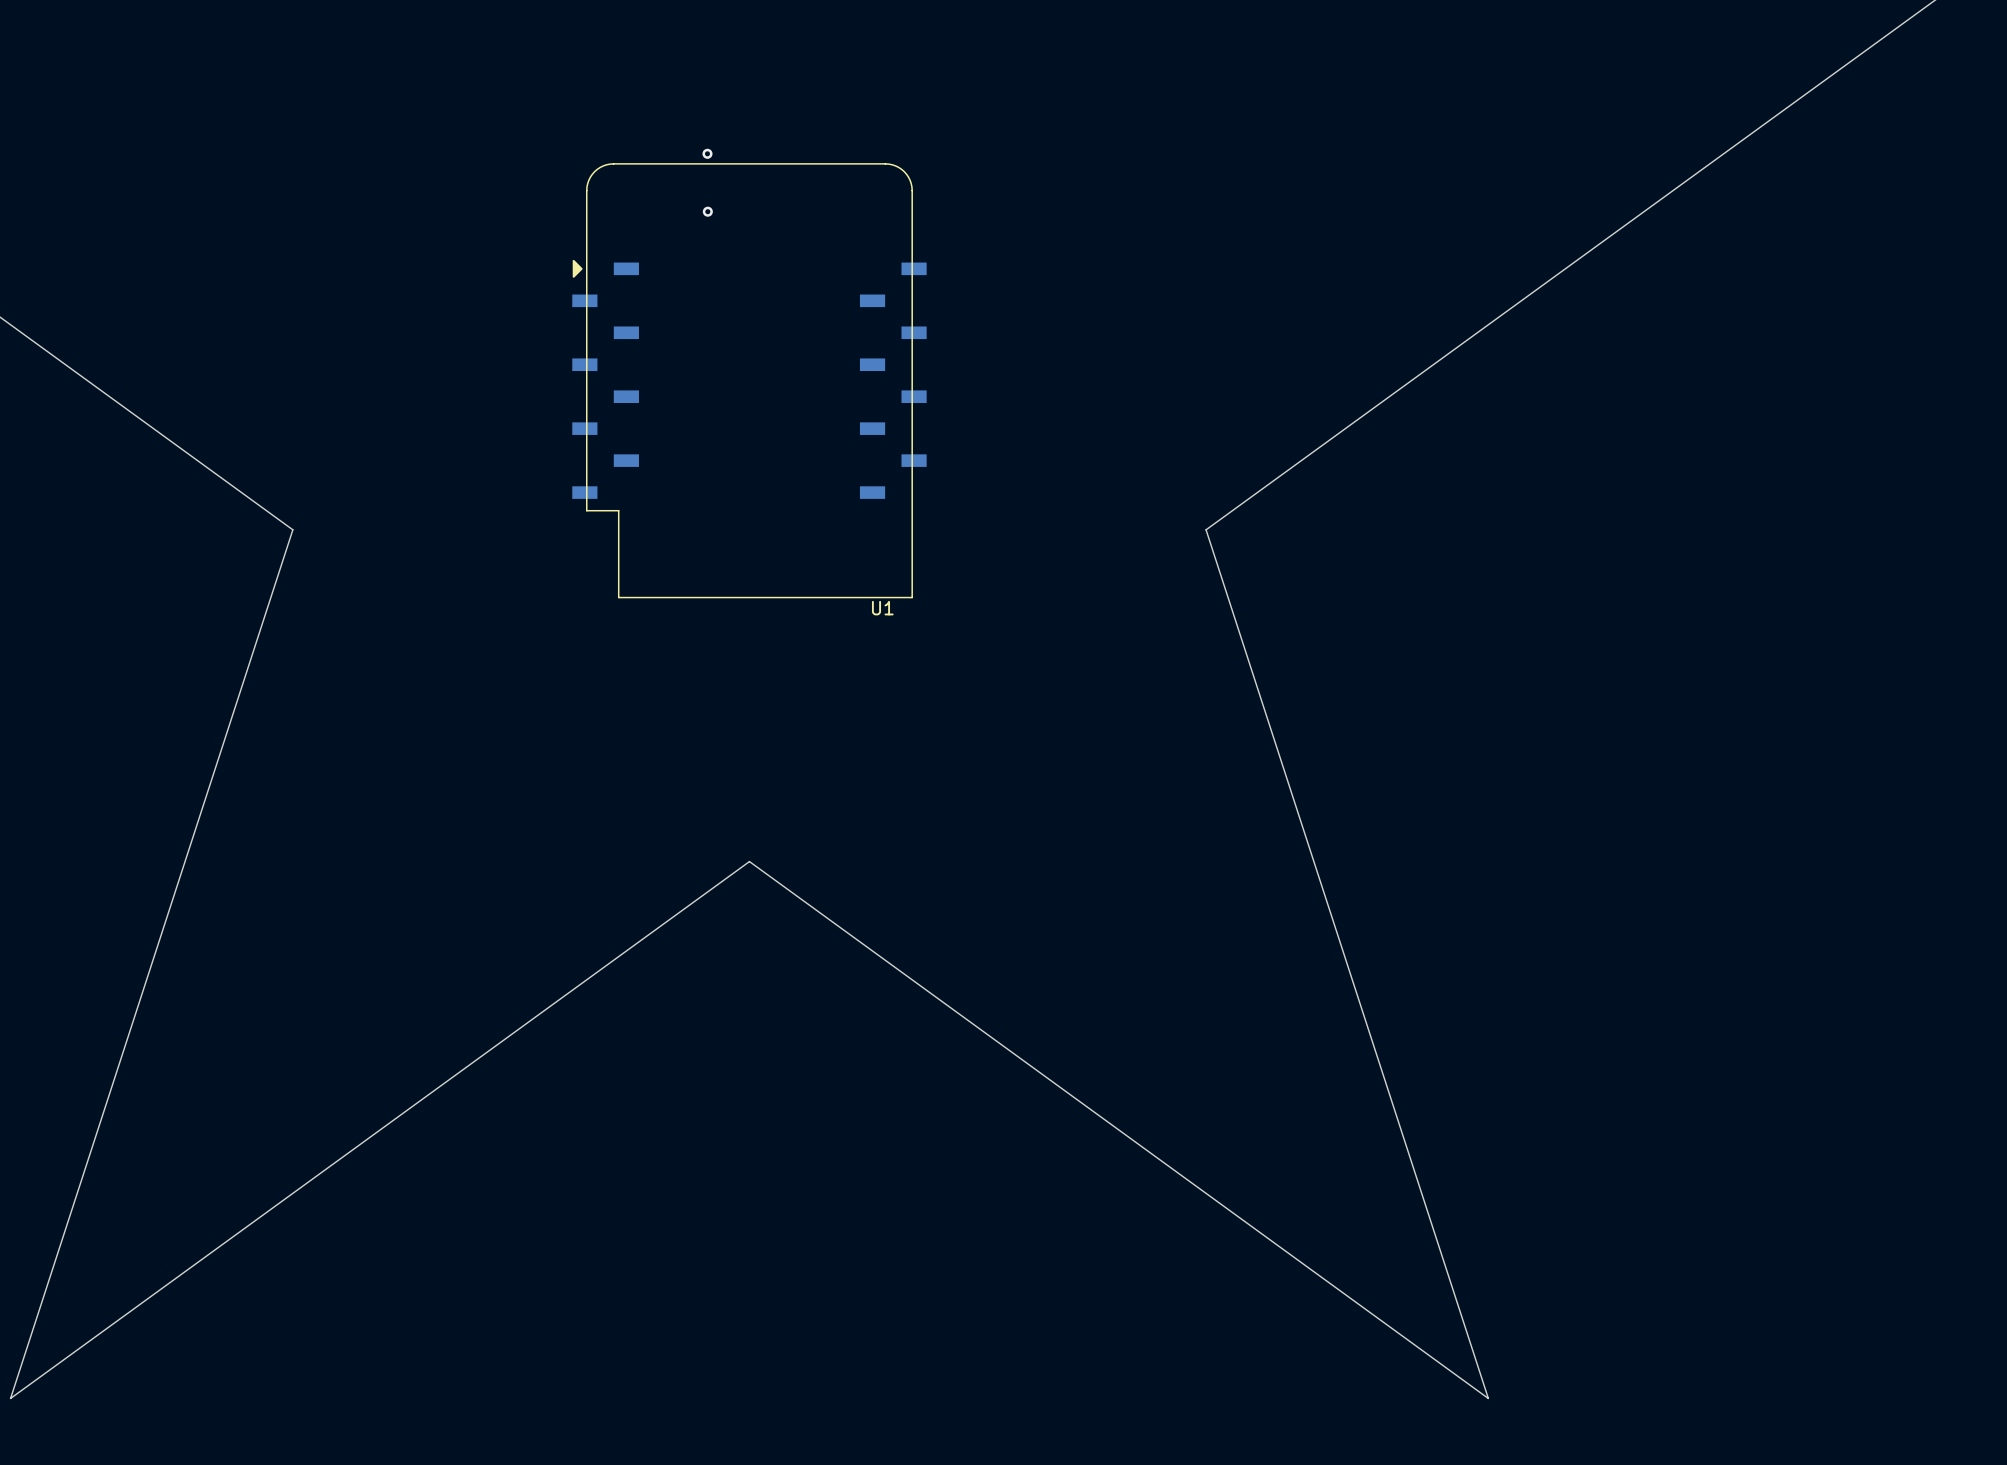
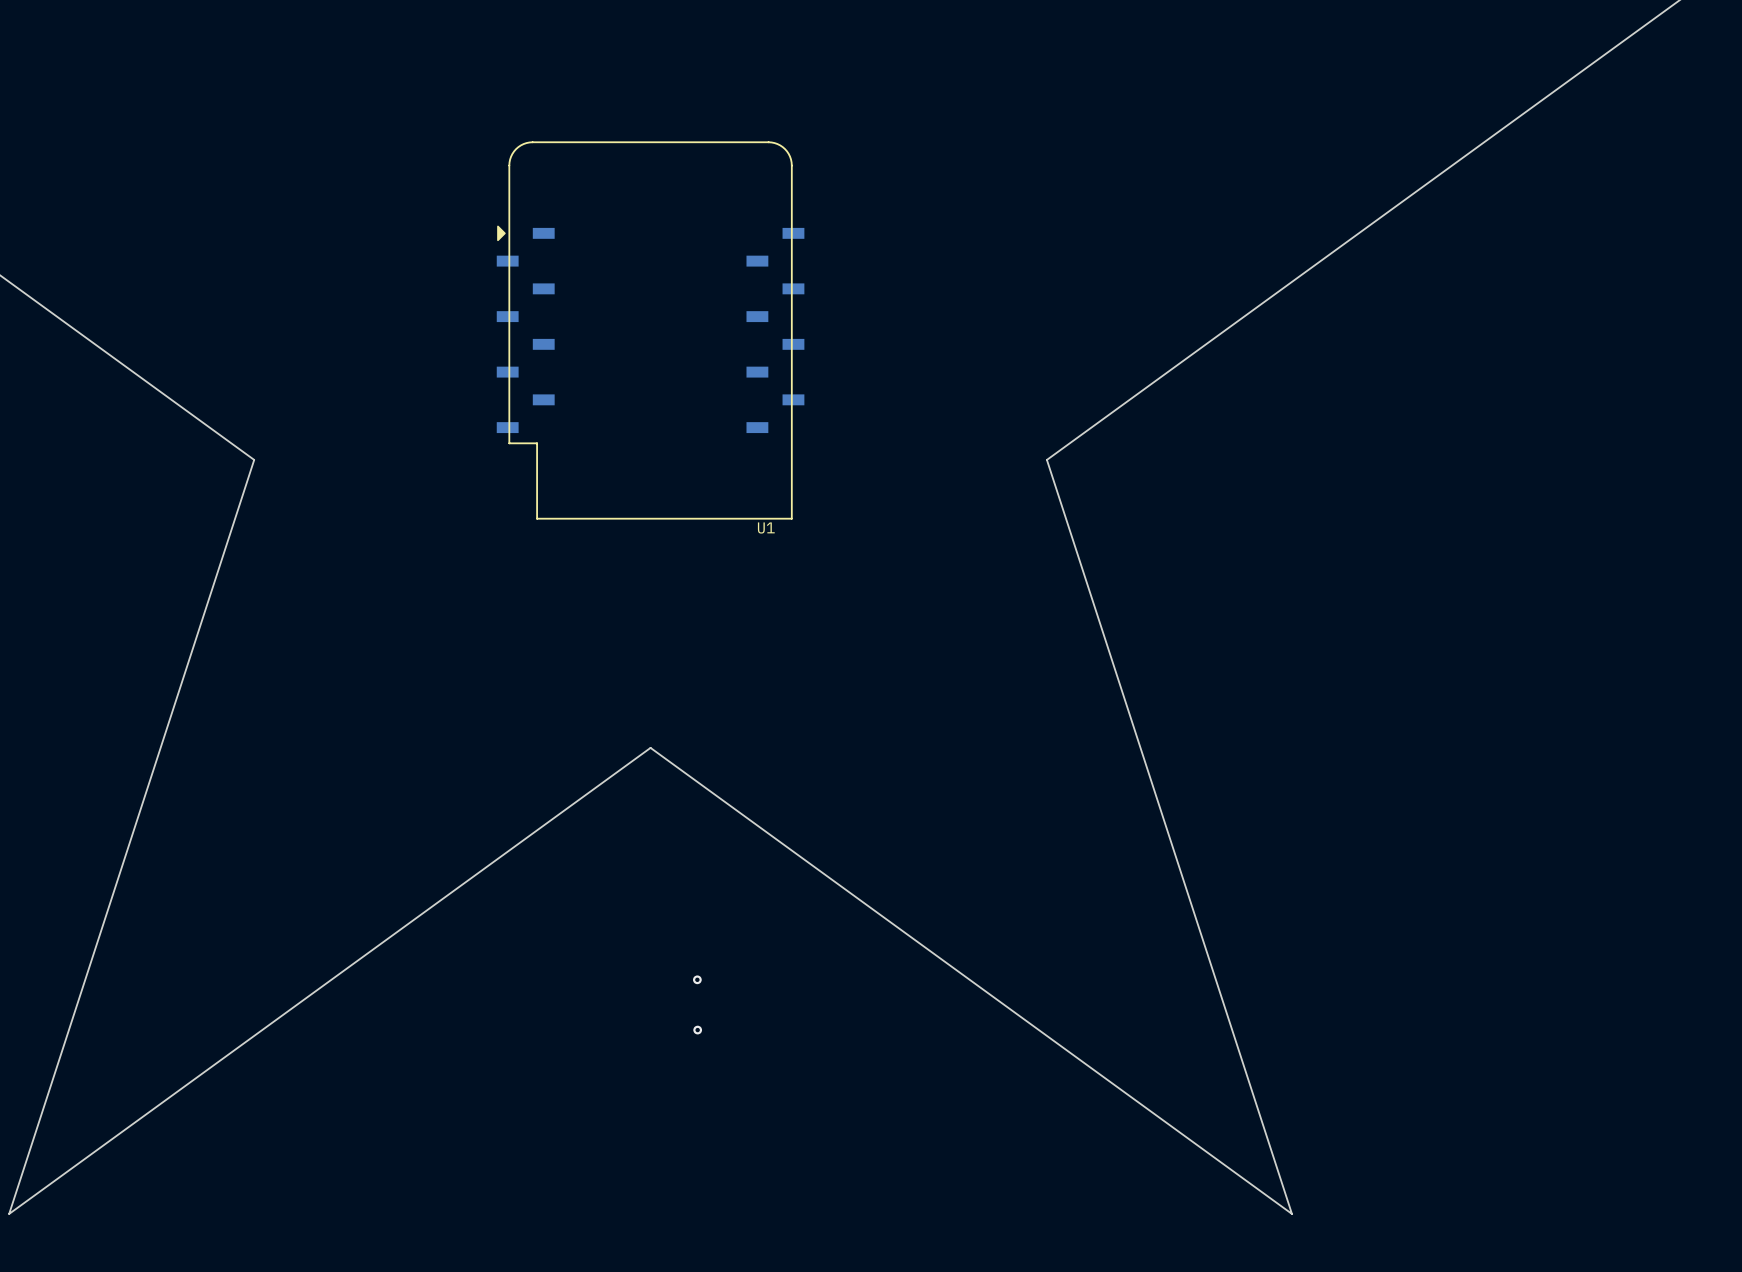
via: (707, 153) -> none
via: (707, 211) -> none
via: none -> (697, 979)
via: none -> (697, 1030)

